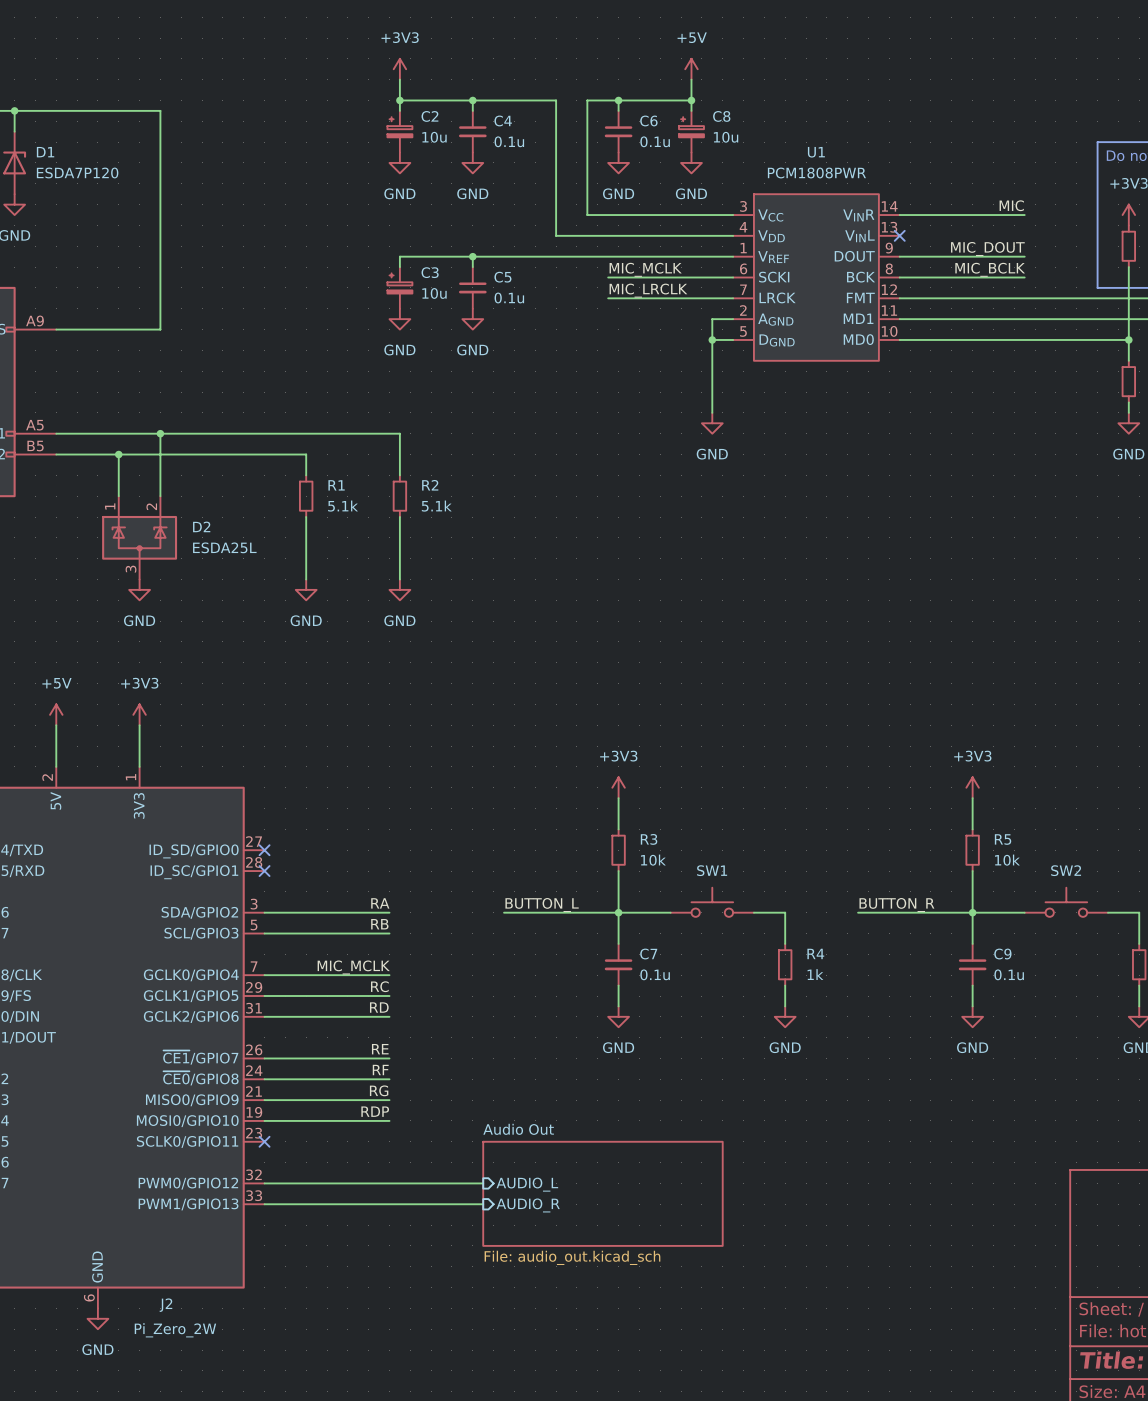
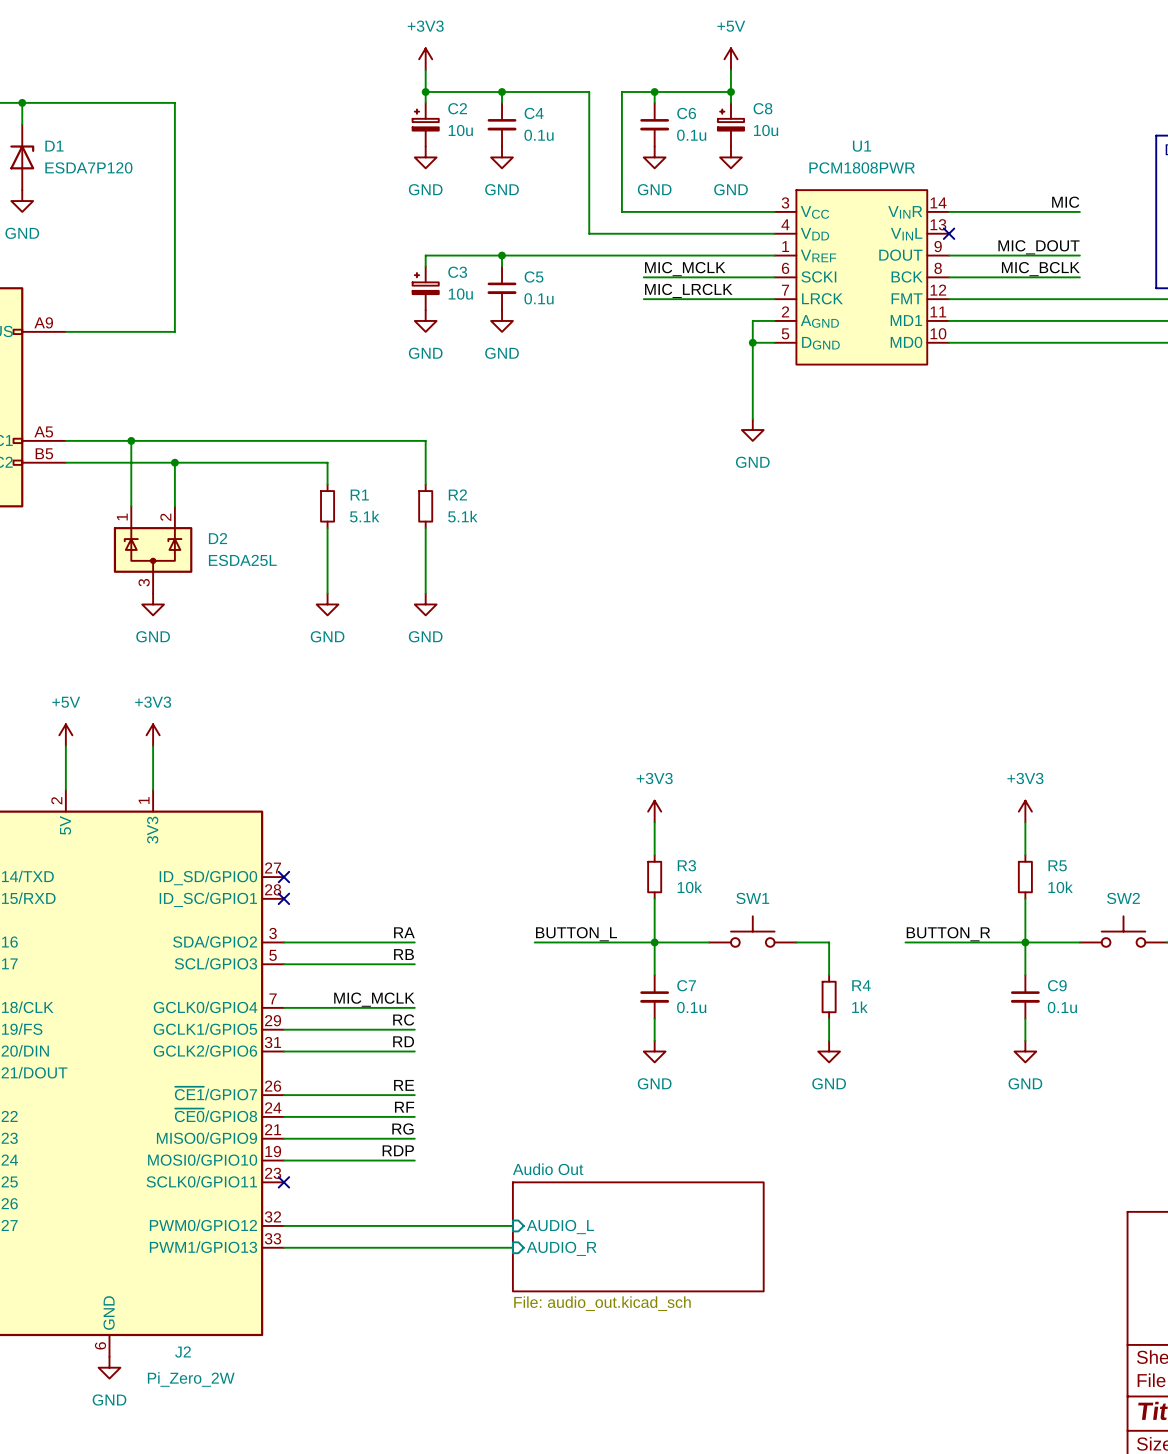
junction: none -> (131, 440)
wire: (160, 433) (160, 454) -> (131, 440) (131, 462)
junction: (160, 433) -> none
junction: (118, 454) -> none
junction: none -> (174, 462)

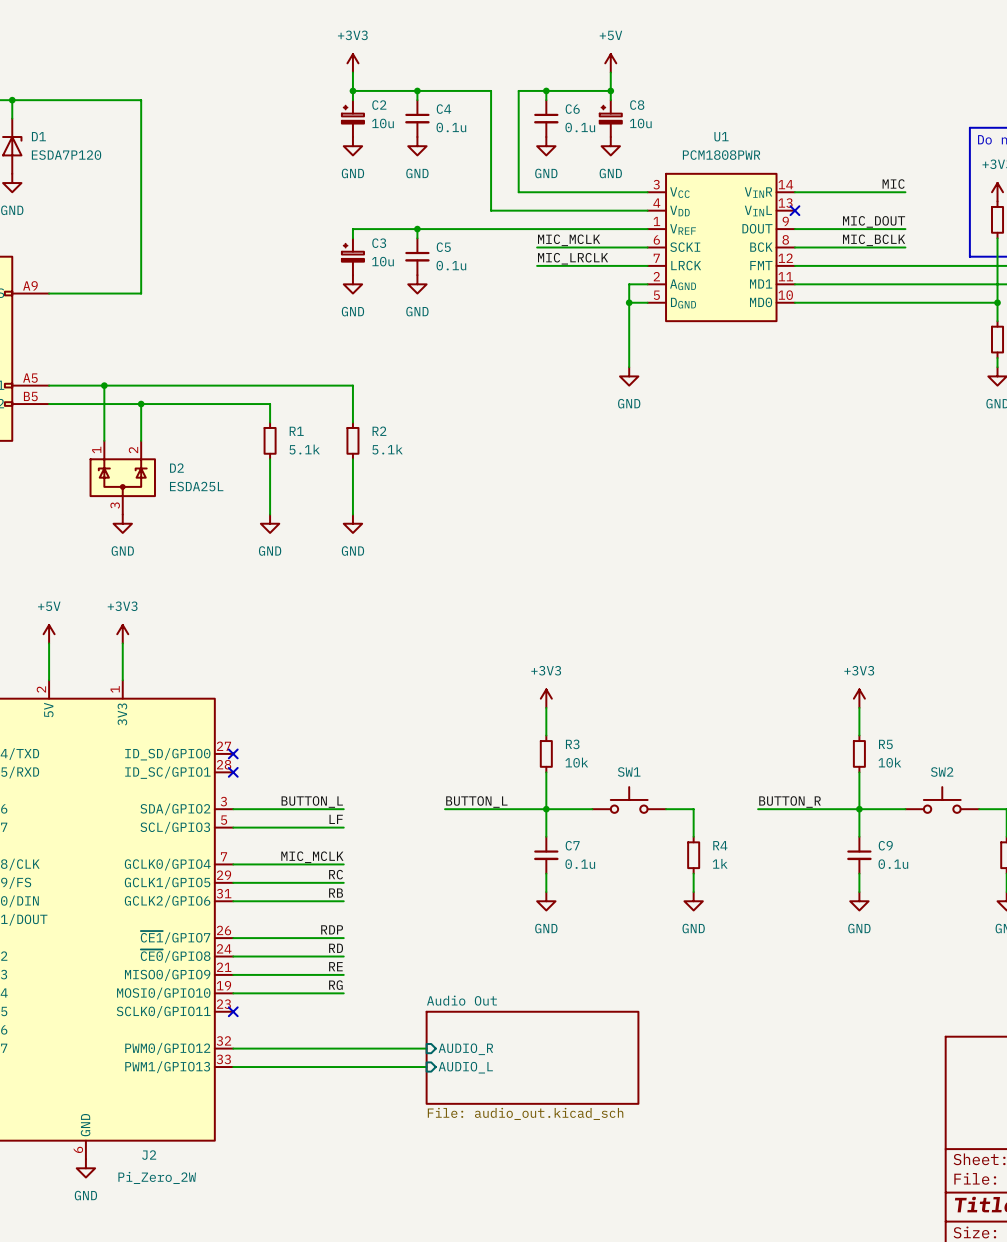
label: RA (404, 932) -> BUTTON_L (312, 802)
label: RB (404, 954) -> LF (336, 819)
label: RD (403, 1041) -> RB (336, 893)
label: RE (404, 1085) -> RDP (332, 929)
label: RF (404, 1107) -> RD (336, 948)
label: RG (402, 1129) -> RE (335, 966)
label: RDP (398, 1150) -> RG (335, 985)
sheet pin: AUDIO_L (560, 1227) -> AUDIO_R (465, 1049)
sheet pin: AUDIO_R (561, 1248) -> AUDIO_L (465, 1067)

